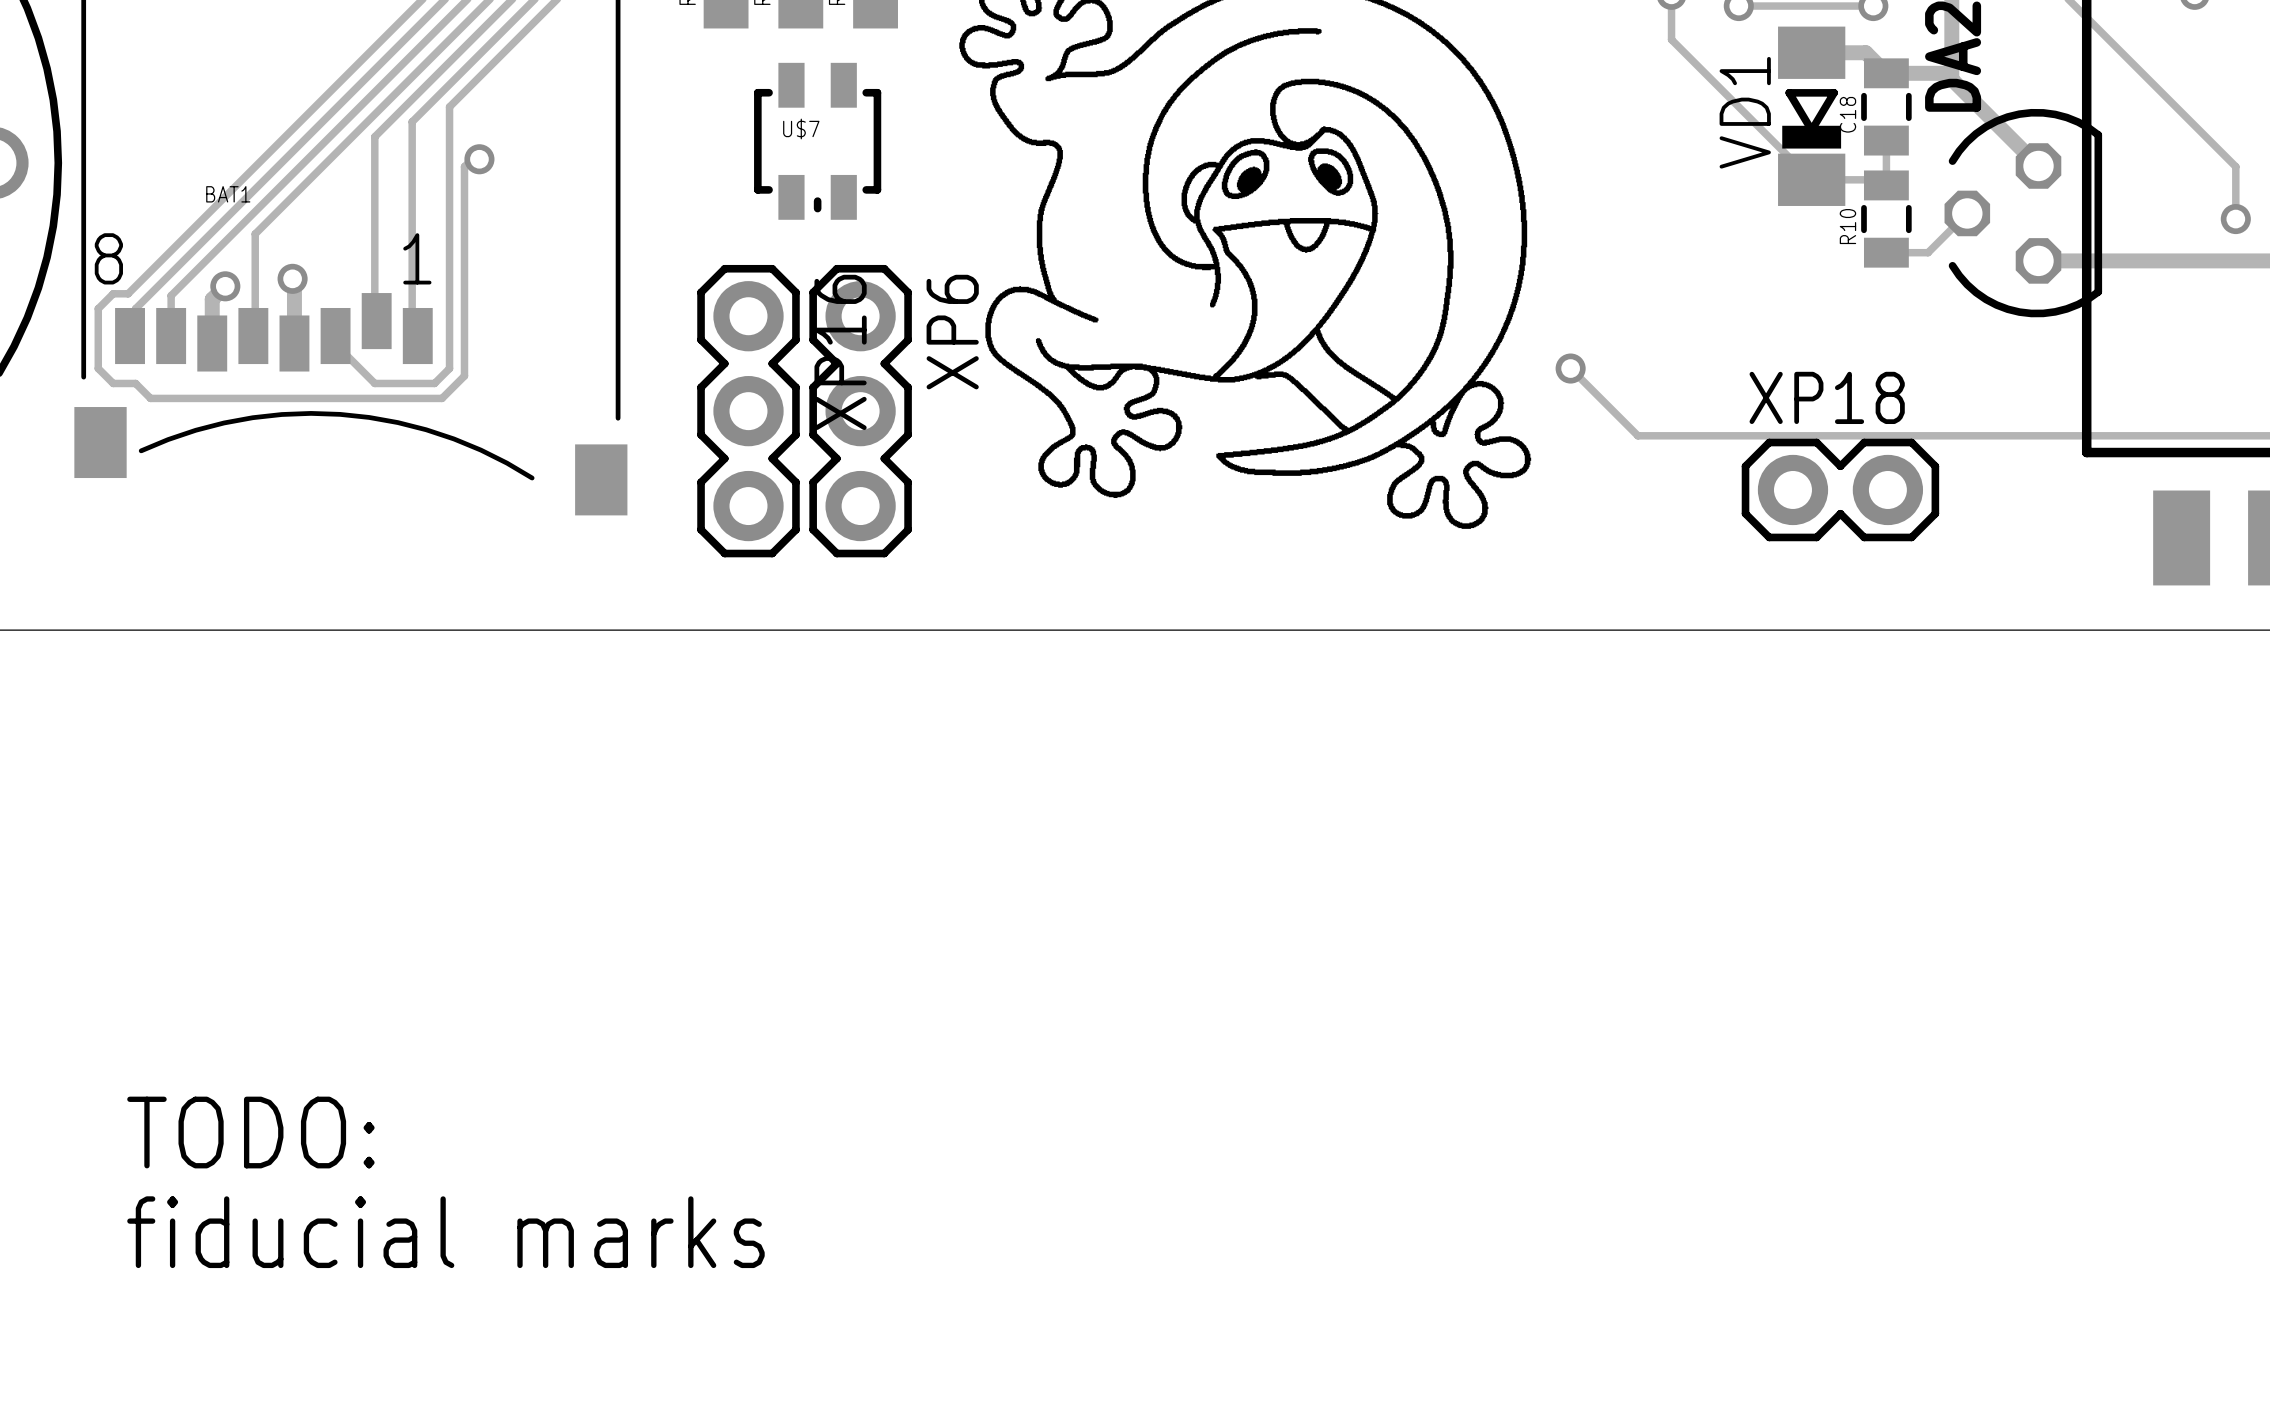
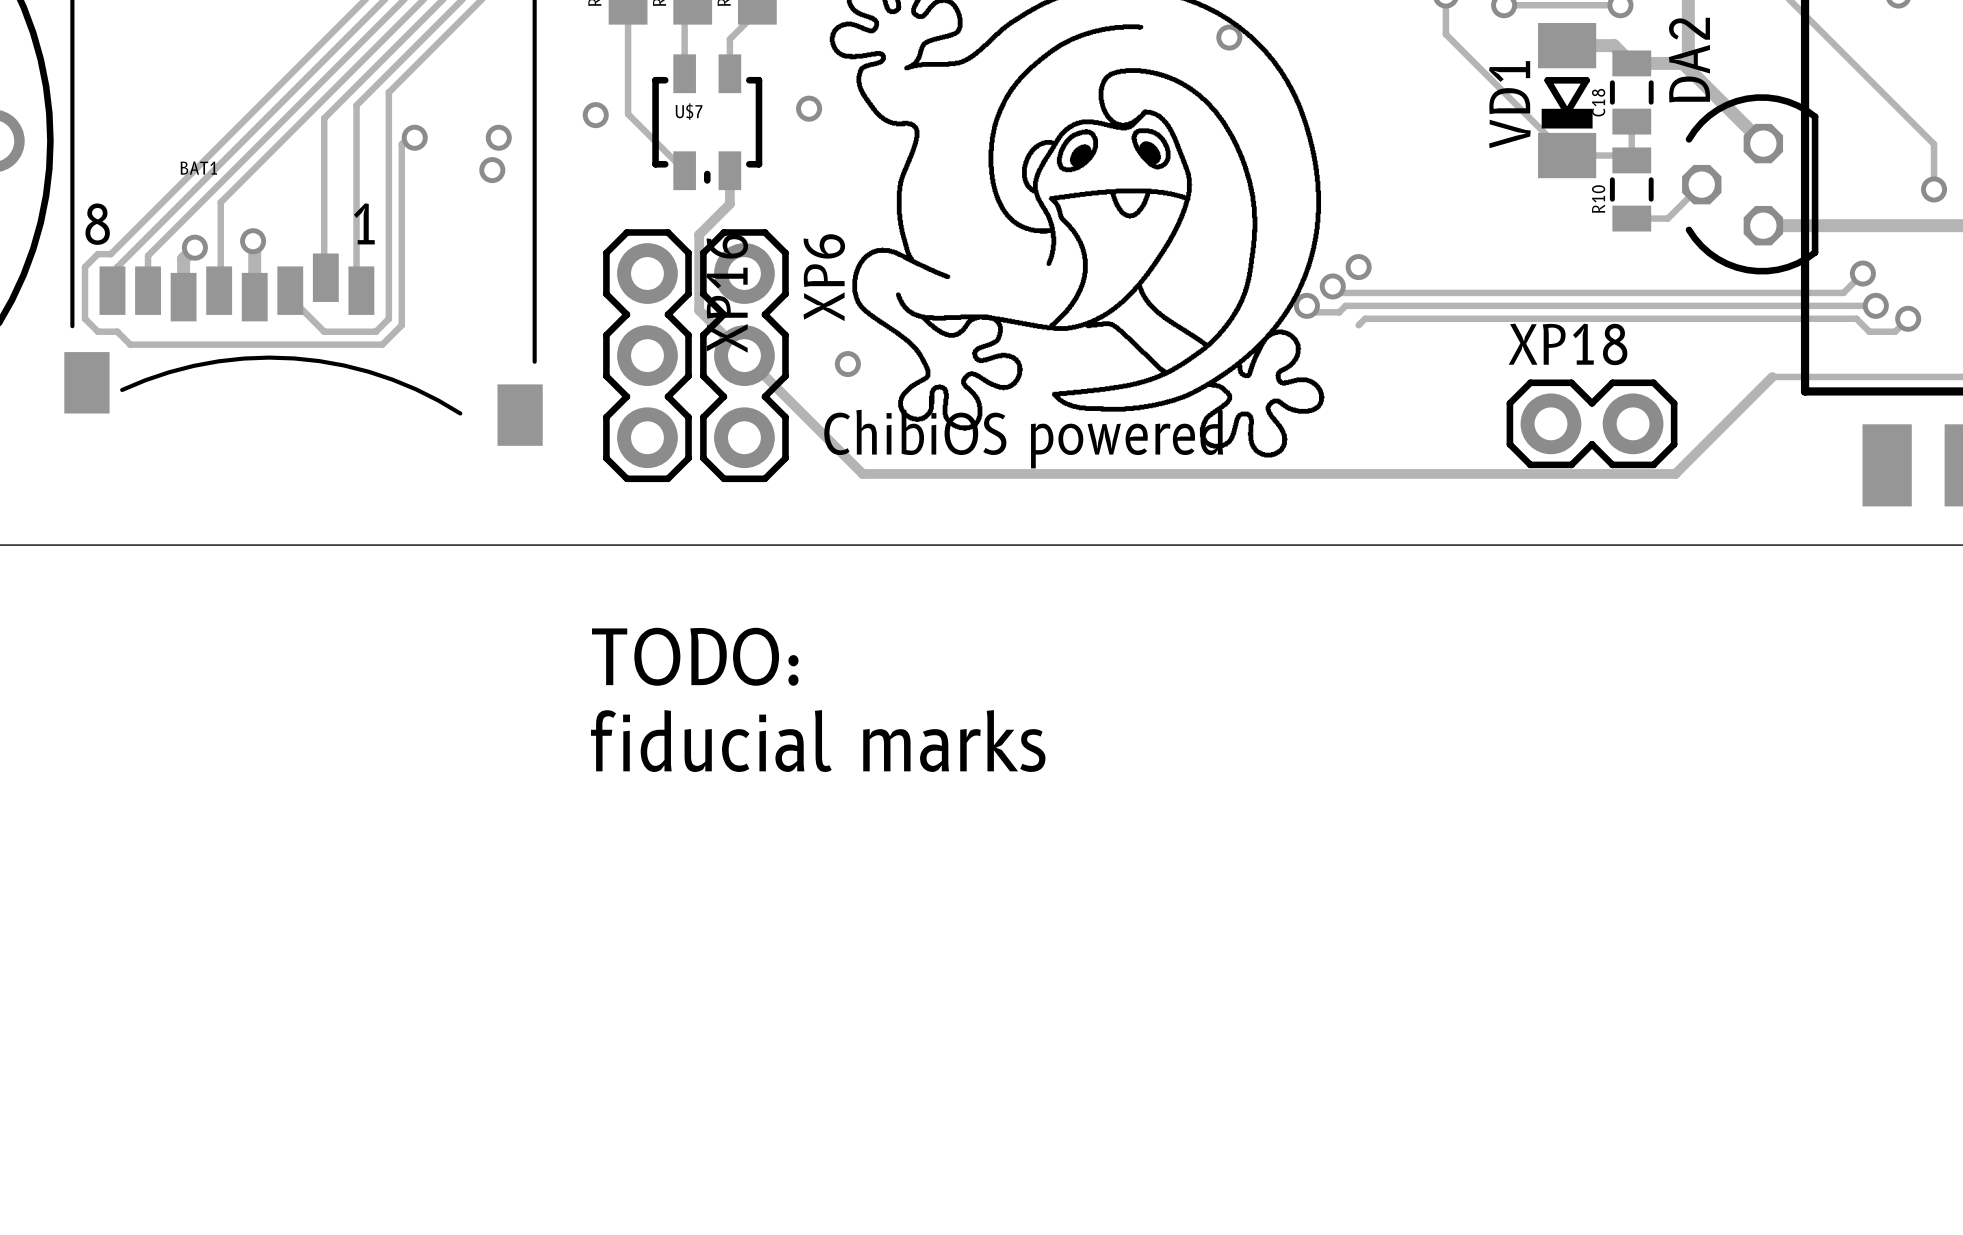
track: none -> (628, 11) (628, 114) (684, 170)
track: none -> (692, 11) (684, 19) (684, 73)
track: none -> (757, 11) (729, 39) (729, 73)
via: none -> (1229, 37)
via: none -> (809, 108)
via: none -> (595, 115)
via: none -> (498, 137)
via: none -> (492, 170)
via: none -> (1358, 267)
track: none -> (1862, 273) (1843, 292) (1339, 292) (1332, 286)
via: none -> (1862, 273)
via: none -> (1332, 286)
track: none -> (1306, 305) (1313, 312) (1339, 312) (1345, 305) (1875, 305)
via: none -> (1306, 305)
via: none -> (1875, 305)
track: (1570, 368) (1637, 435) (2048, 435) -> (729, 170) (729, 204) (699, 234) (699, 310) (862, 473) (1675, 473) (1772, 376)
via: (1570, 368) -> none
track: none -> (1908, 318) (1895, 331) (1869, 331) (1856, 318) (1365, 318) (1358, 325)
via: none -> (1908, 318)
via: none -> (847, 364)
text: none -> ChibiOS powered (1023, 439)
text position: TODO: (250, 1132) -> TODO: (695, 656)
text position: fiducial marks (445, 1232) -> fiducial marks (818, 741)

